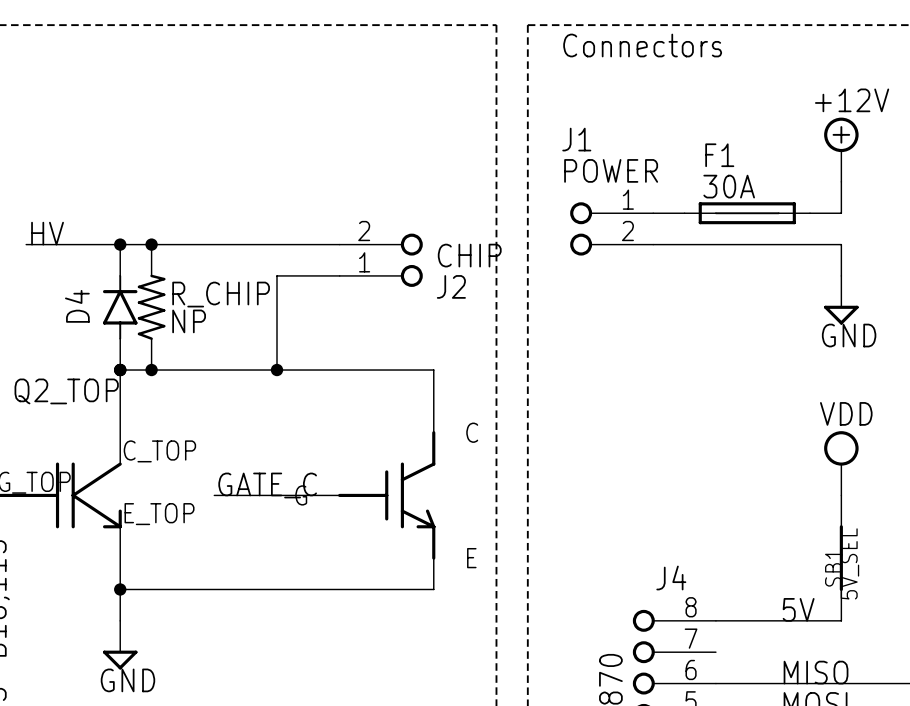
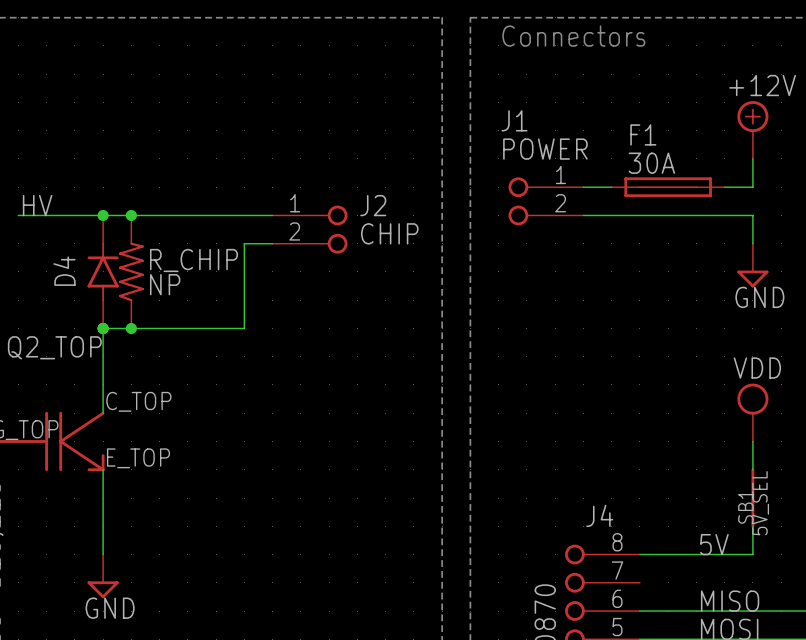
J2 flip: as is (411, 260) -> up-down (337, 229)
wire: (277, 370) (433, 370) (433, 432) -> none
junction: (277, 370) -> none
label: GATE_C (267, 485) -> none
wire: (214, 495) (339, 495) -> none
part: (386, 495) -> none
wire: (433, 558) (433, 589) (120, 589) -> none
junction: (120, 589) -> none

